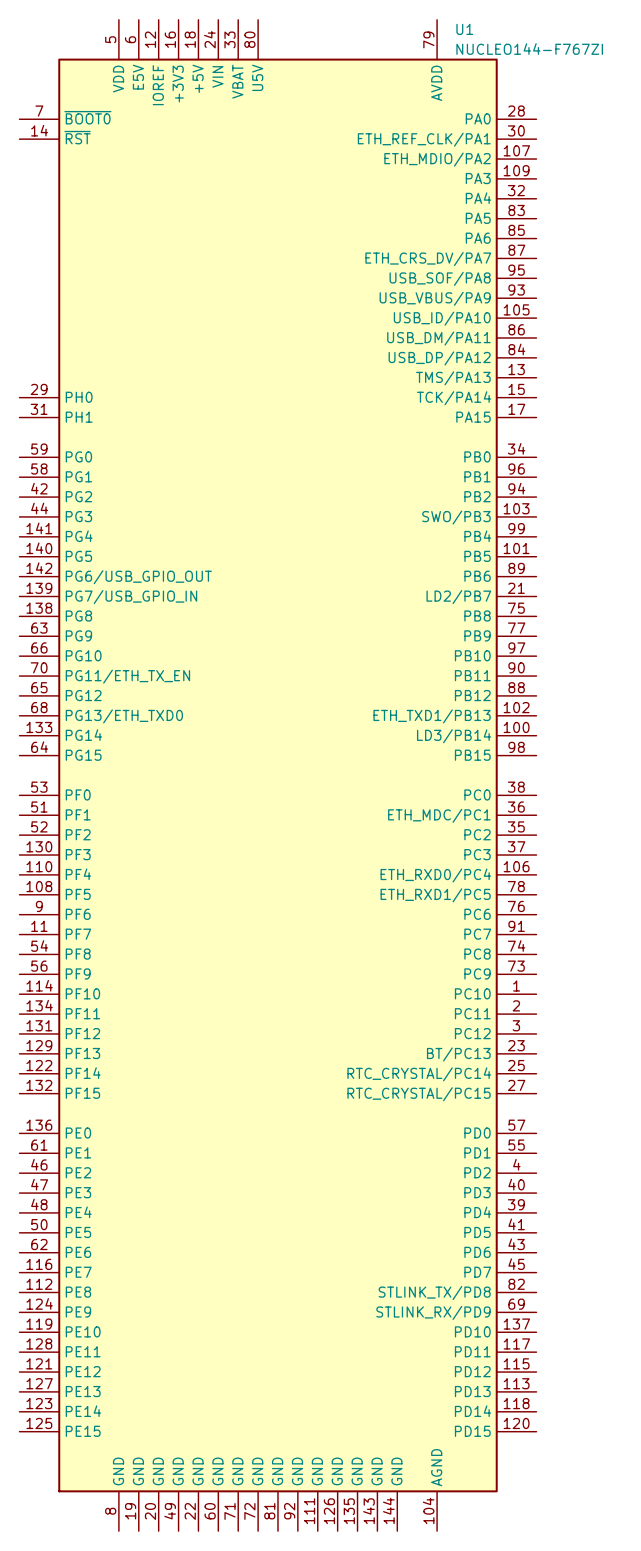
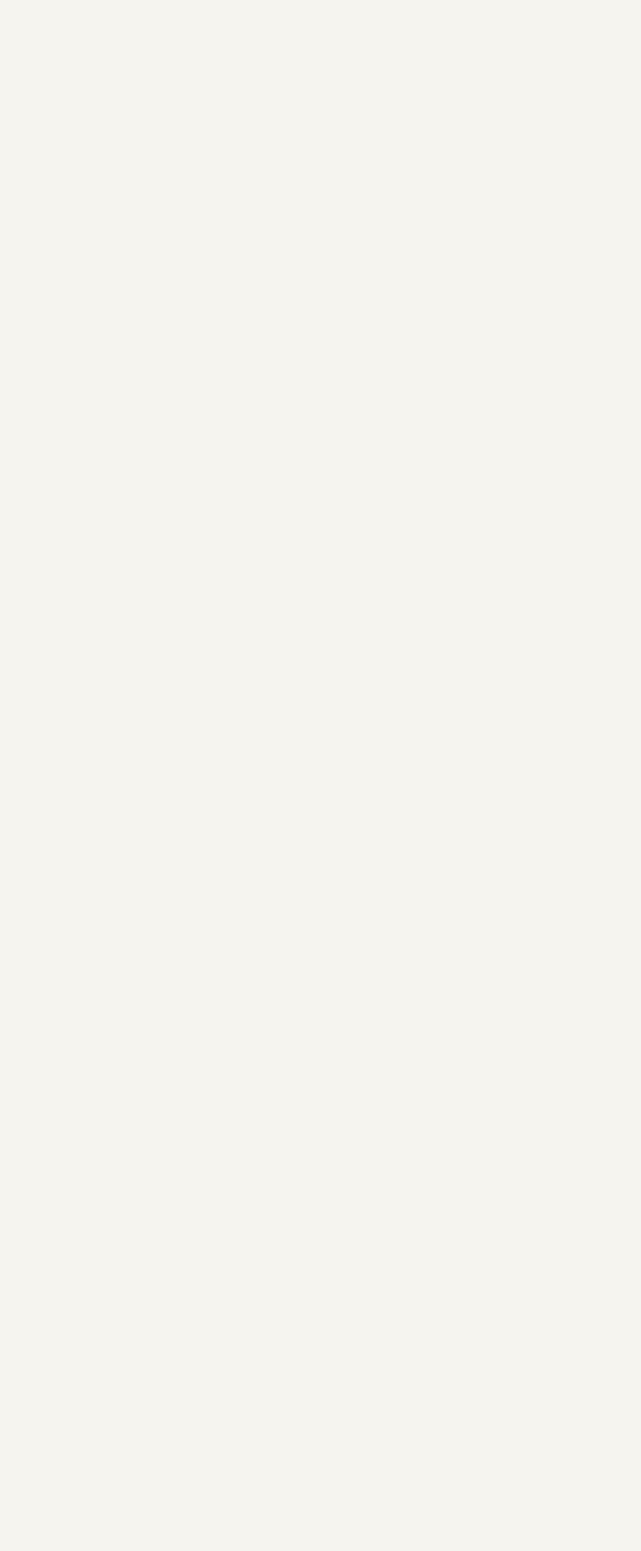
U1: NUCLEO144-F767ZI (277, 775) -> none

